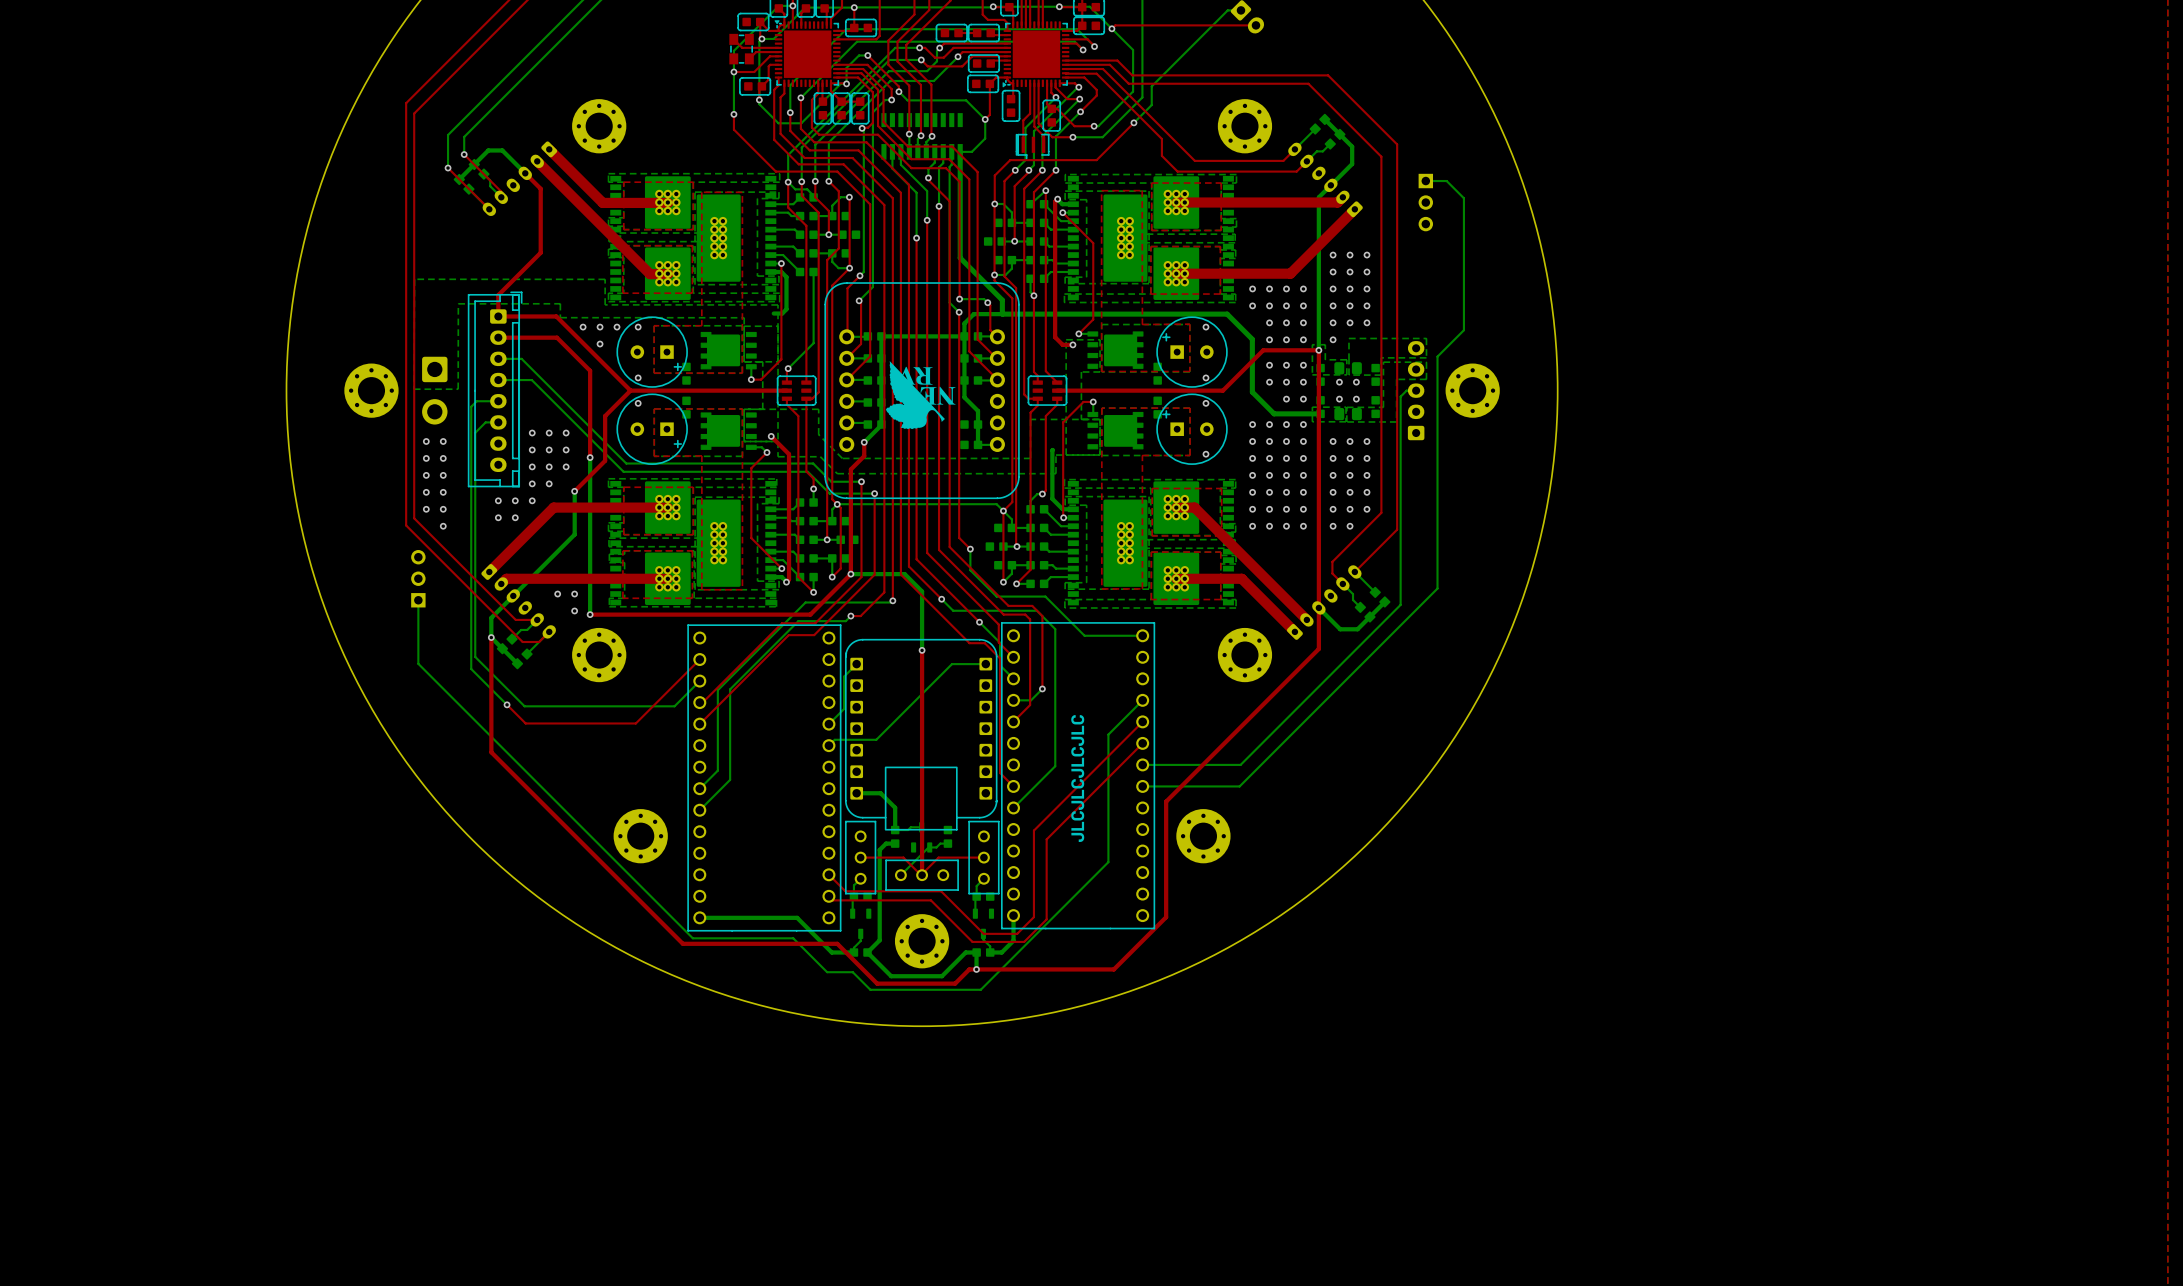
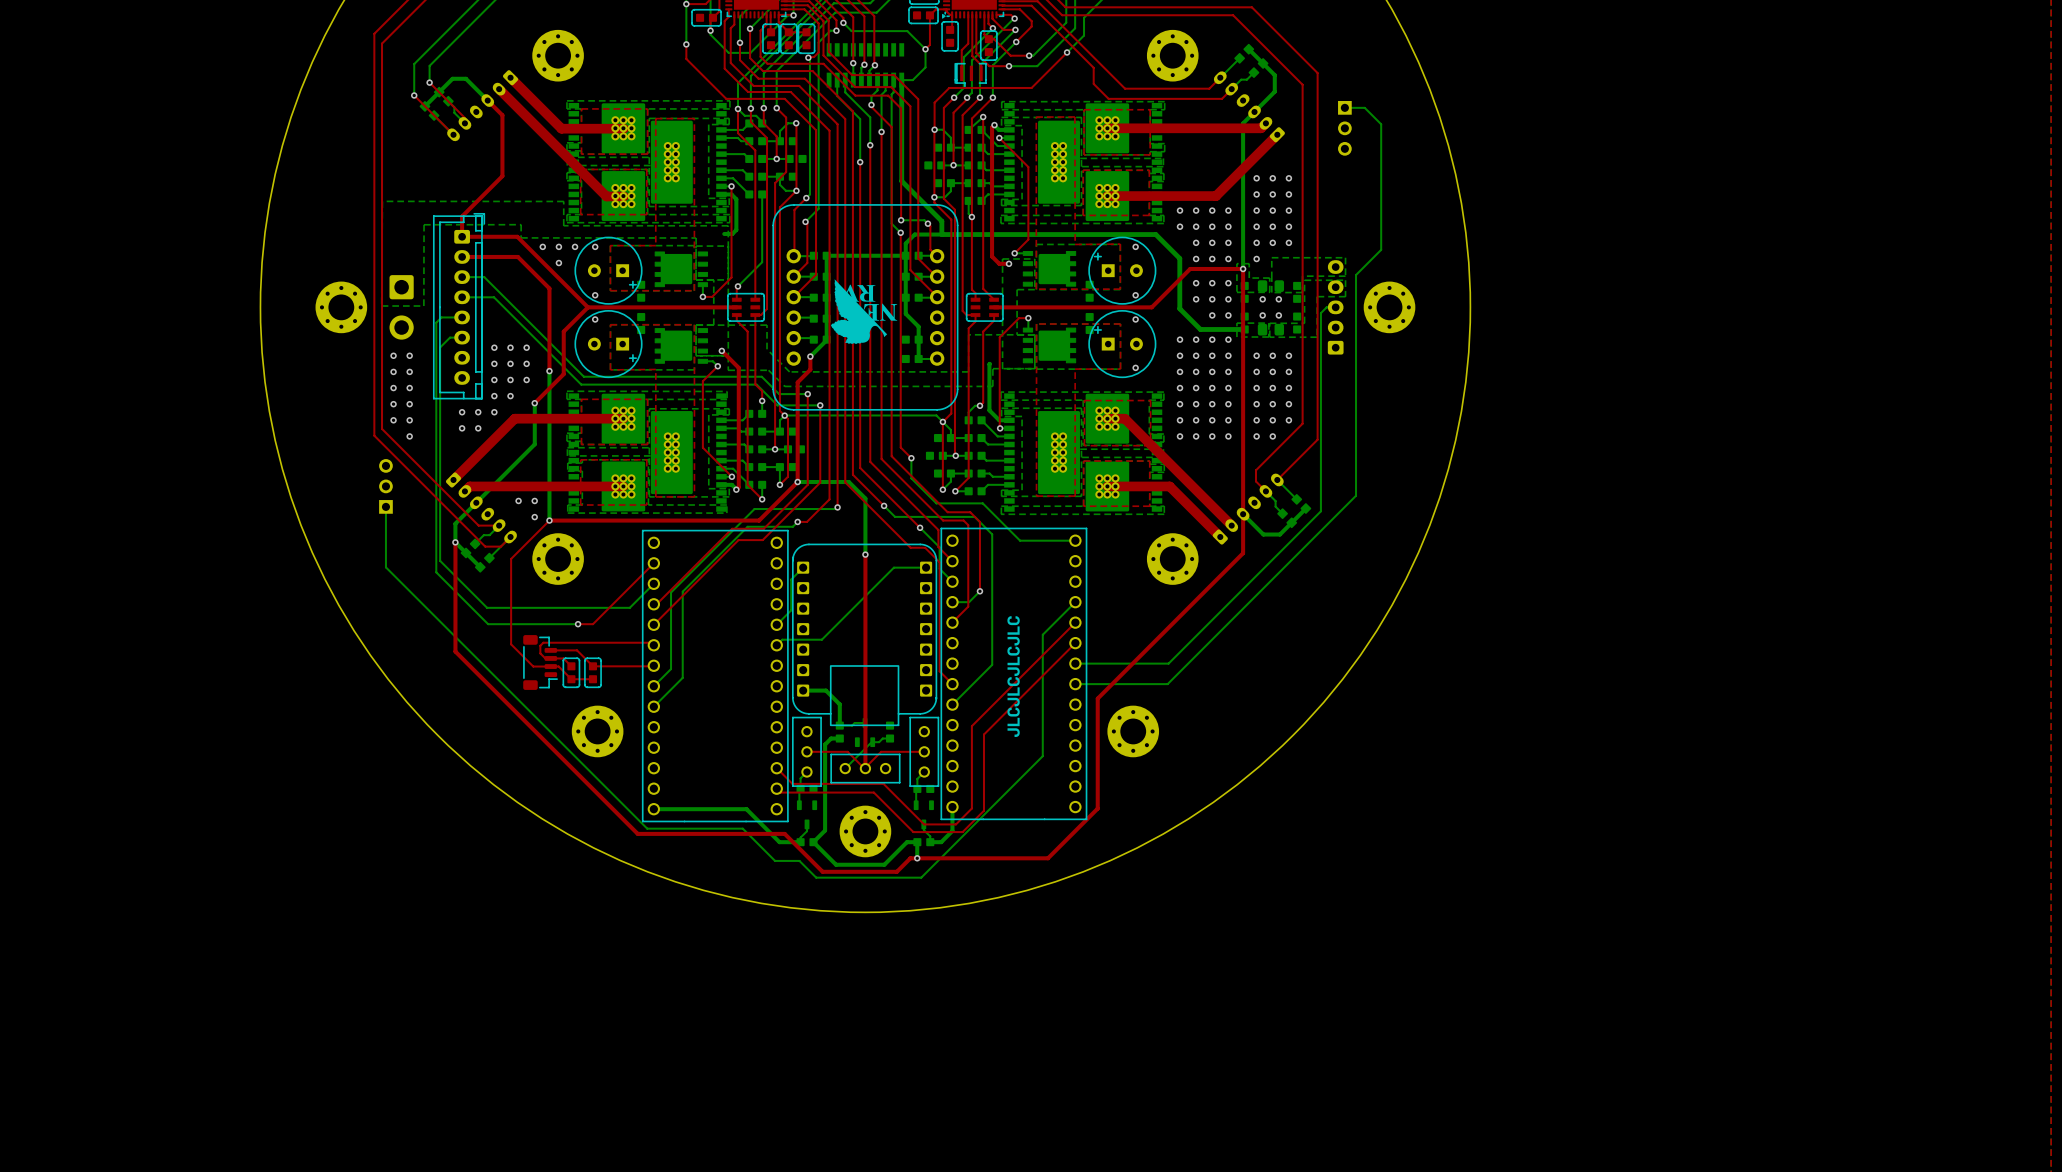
top track: none -> (549, 520) (511, 558) (511, 644) (533, 666) (558, 666) (571, 679) (592, 679)
top track: (507, 704) (525, 723) (620, 723) -> none
bottom track: none -> (470, 606) (488, 624) (578, 624)
via: (507, 704) -> none
via: none -> (578, 624)
top track: none -> (653, 645) (651, 642) (543, 642) (540, 645) (540, 653) (545, 658) (563, 658) (571, 666)
top track: none -> (550, 650) (577, 650) (592, 666) (653, 665)
part: none -> (540, 662)
part: none -> (571, 672)
part: none -> (592, 672)

